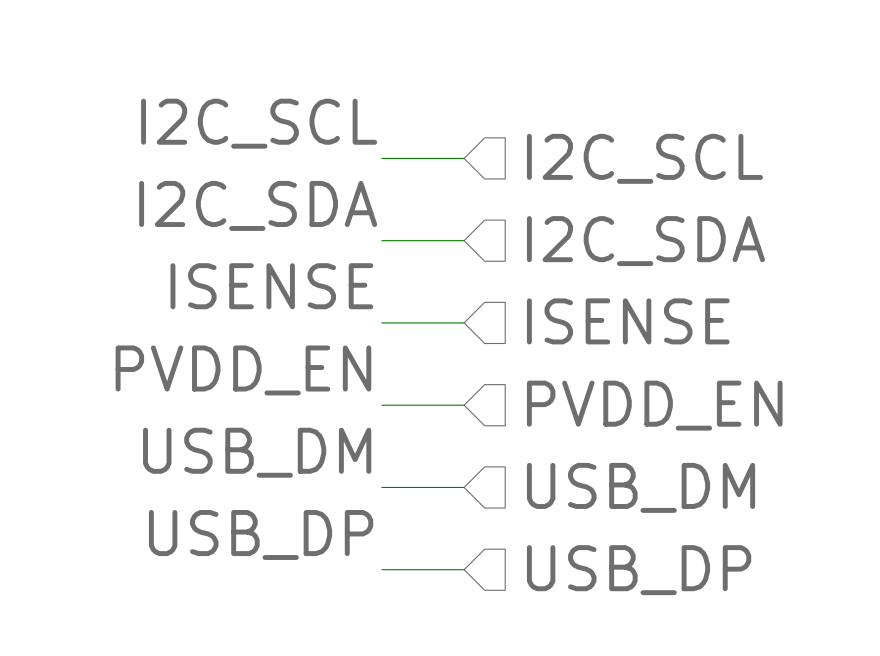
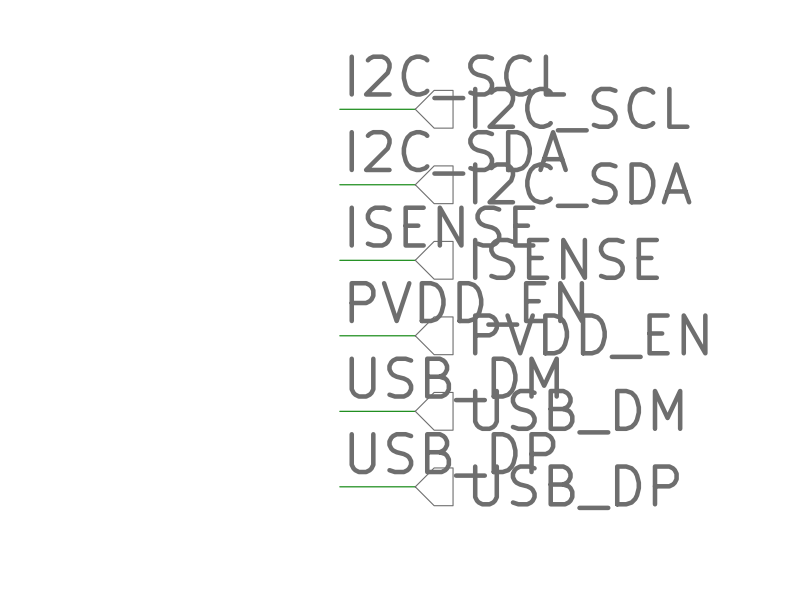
label position: I2C_SCL (259, 123) -> I2C_SCL (457, 77)
label position: I2C_SDA (258, 205) -> I2C_SDA (458, 152)
label position: ISENSE (271, 286) -> ISENSE (442, 226)
label position: PVDD_EN (243, 370) -> PVDD_EN (466, 303)
label position: USB_DM (257, 452) -> USB_DM (454, 379)
label position: USB_DP (261, 534) -> USB_DP (452, 454)

